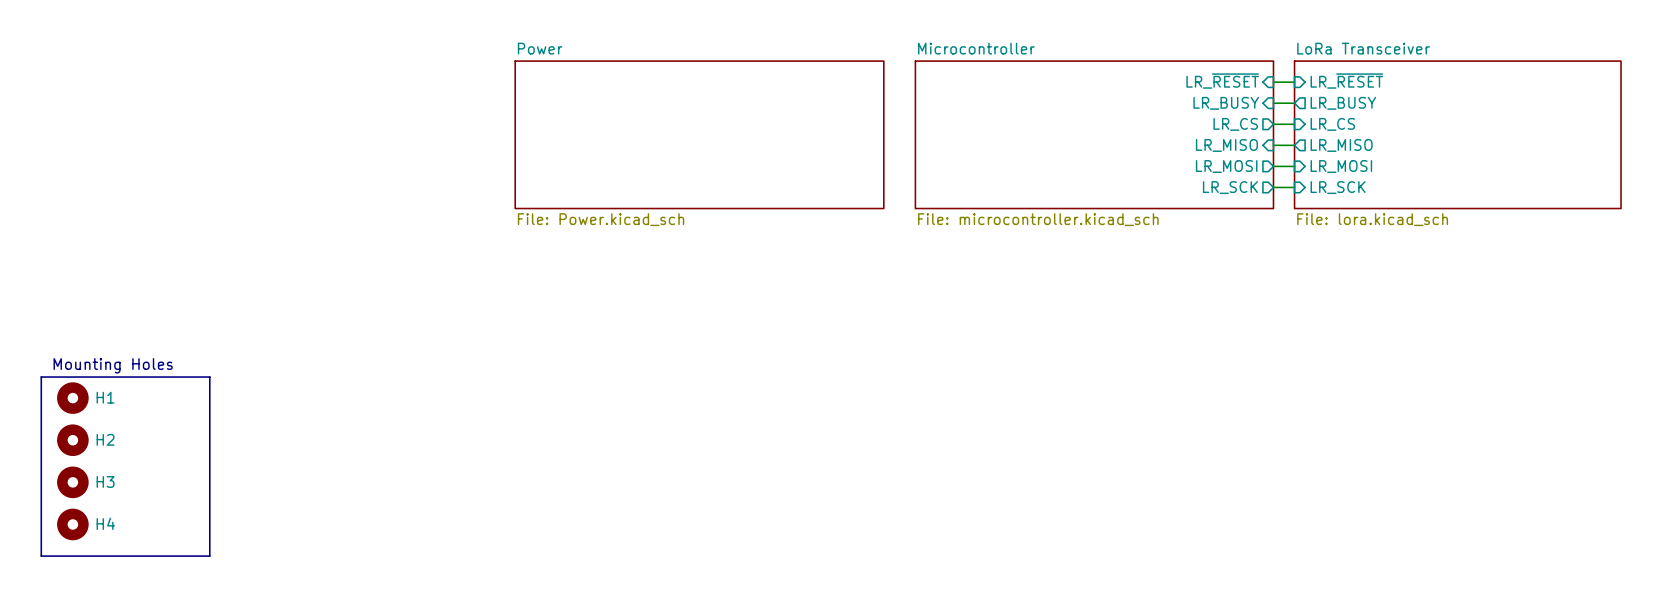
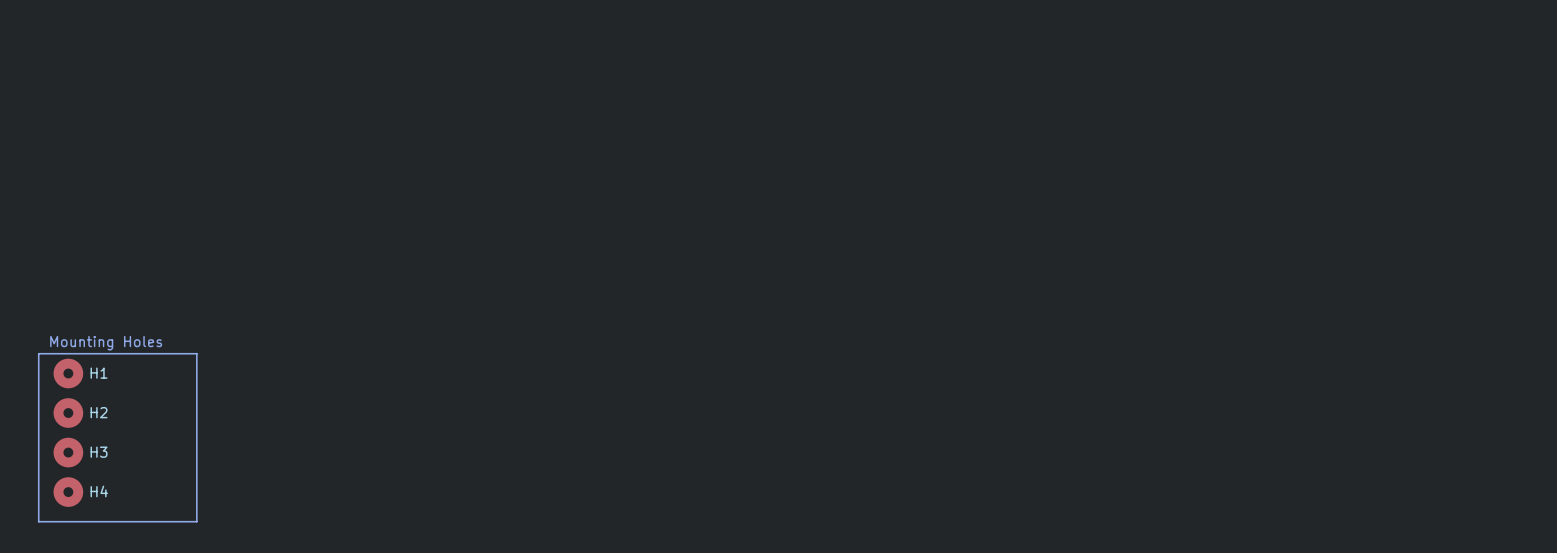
sheet pin: LR_~{RESET} (1222, 81) -> none
sheet pin: LR_~{RESET} (1346, 81) -> none
wire: (1273, 82) (1294, 82) -> none
sheet pin: LR_BUSY (1226, 103) -> none
wire: (1273, 103) (1294, 103) -> none
sheet pin: LR_BUSY (1343, 103) -> none
sheet pin: LR_CS (1235, 124) -> none
wire: (1273, 124) (1294, 124) -> none
sheet pin: LR_CS (1332, 124) -> none
sheet Power: File: Power.kicad_sch (699, 134) -> none
sheet Microcontroller: File: microcontroller.kicad_sch (1094, 134) -> none
sheet LoRa Transceiver: File: lora.kicad_sch (1457, 134) -> none
sheet pin: LR_MISO (1226, 145) -> none
wire: (1273, 145) (1294, 145) -> none
sheet pin: LR_MISO (1341, 145) -> none
sheet pin: LR_MOSI (1226, 166) -> none
wire: (1273, 166) (1294, 166) -> none
sheet pin: LR_MOSI (1341, 166) -> none
sheet pin: LR_SCK (1230, 187) -> none
wire: (1273, 187) (1294, 187) -> none
sheet pin: LR_SCK (1338, 187) -> none

